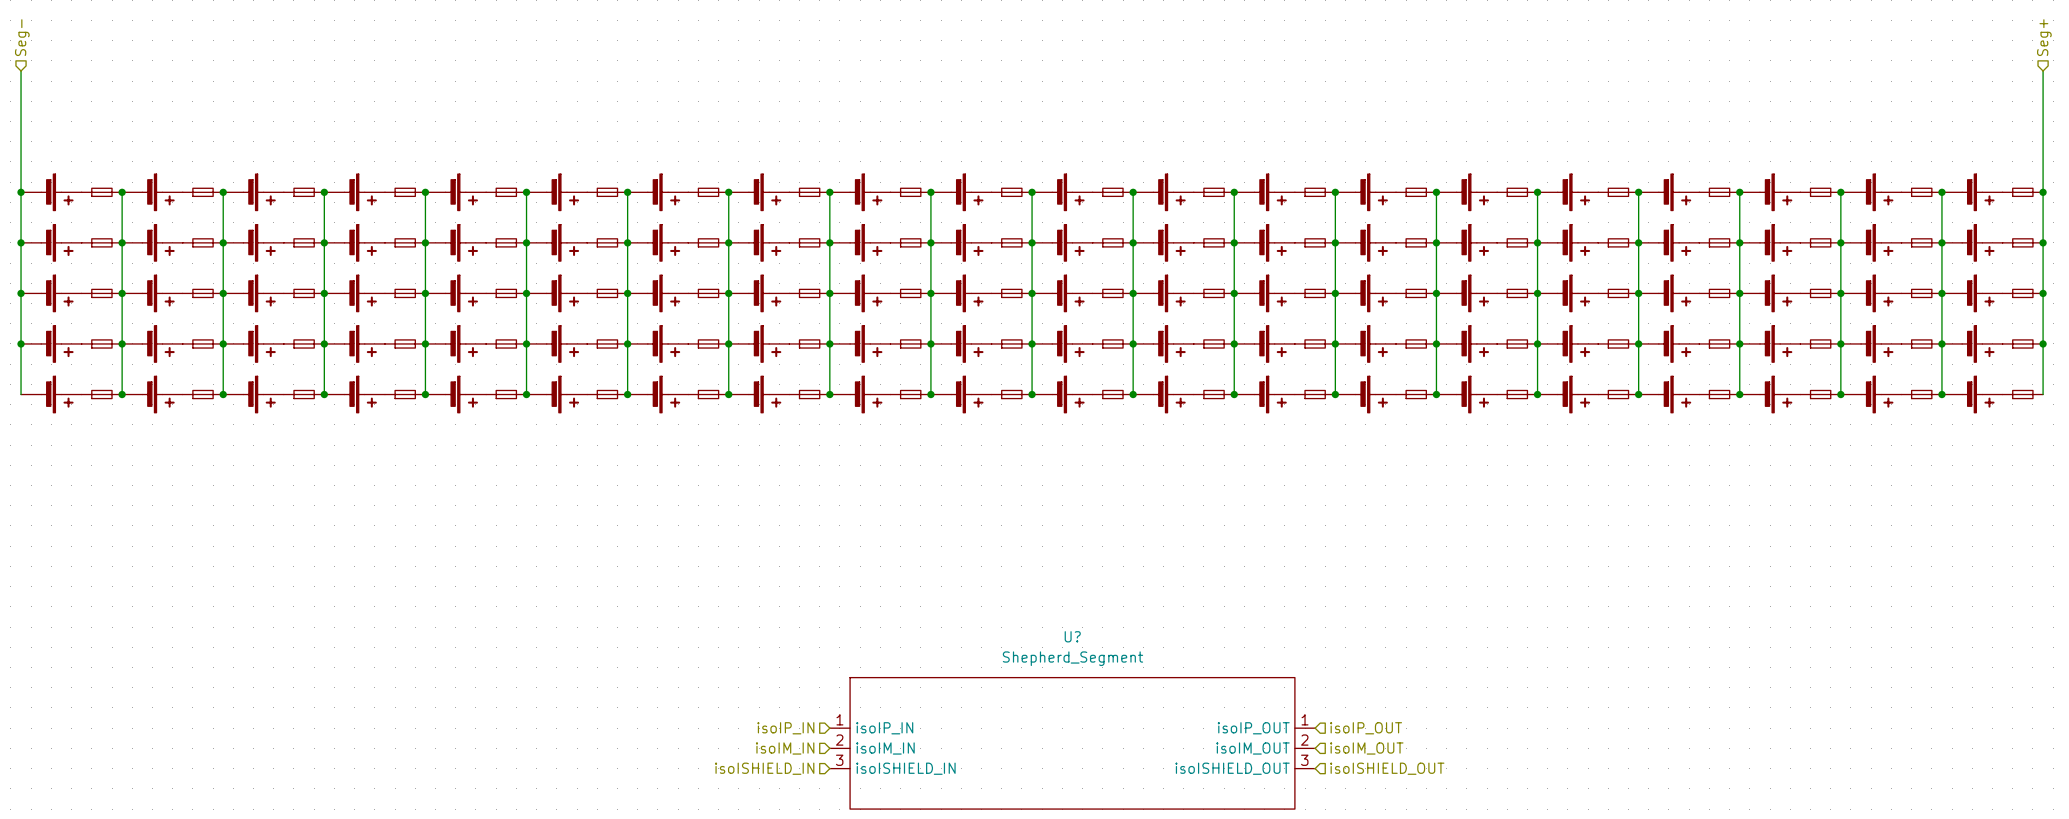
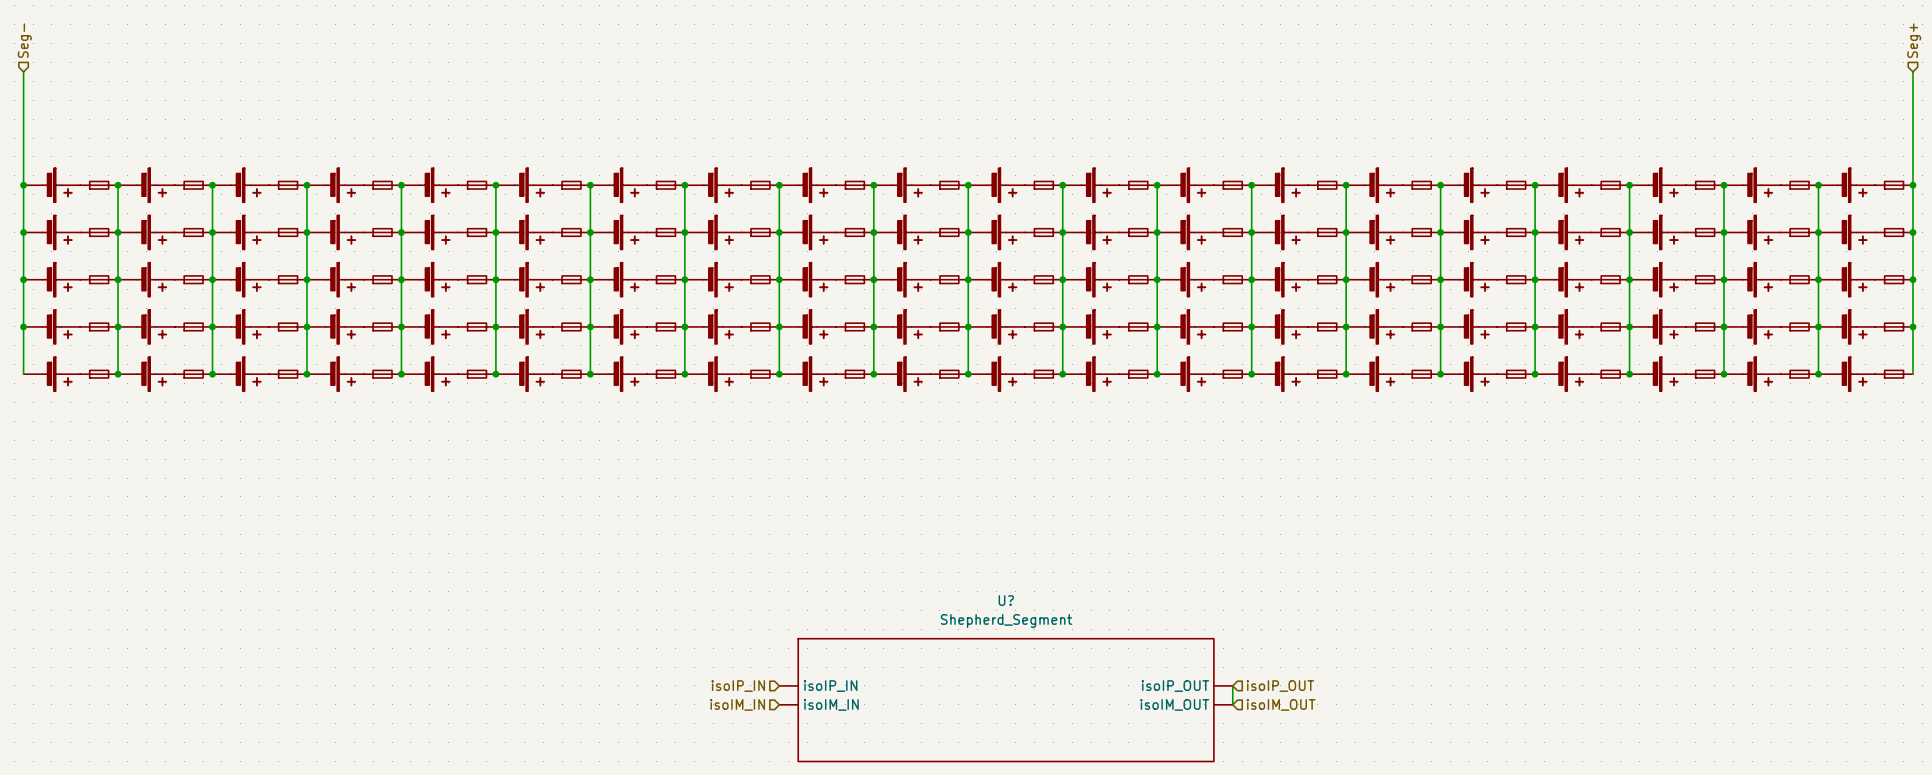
U? symbol: [829, 677, 1316, 810] -> [779, 638, 1233, 762]
wire: none -> (1232, 685) (1232, 704)
hierarchical label: isoISHIELD_IN (764, 768) -> none
hierarchical label: isoISHIELD_OUT (1387, 768) -> none

